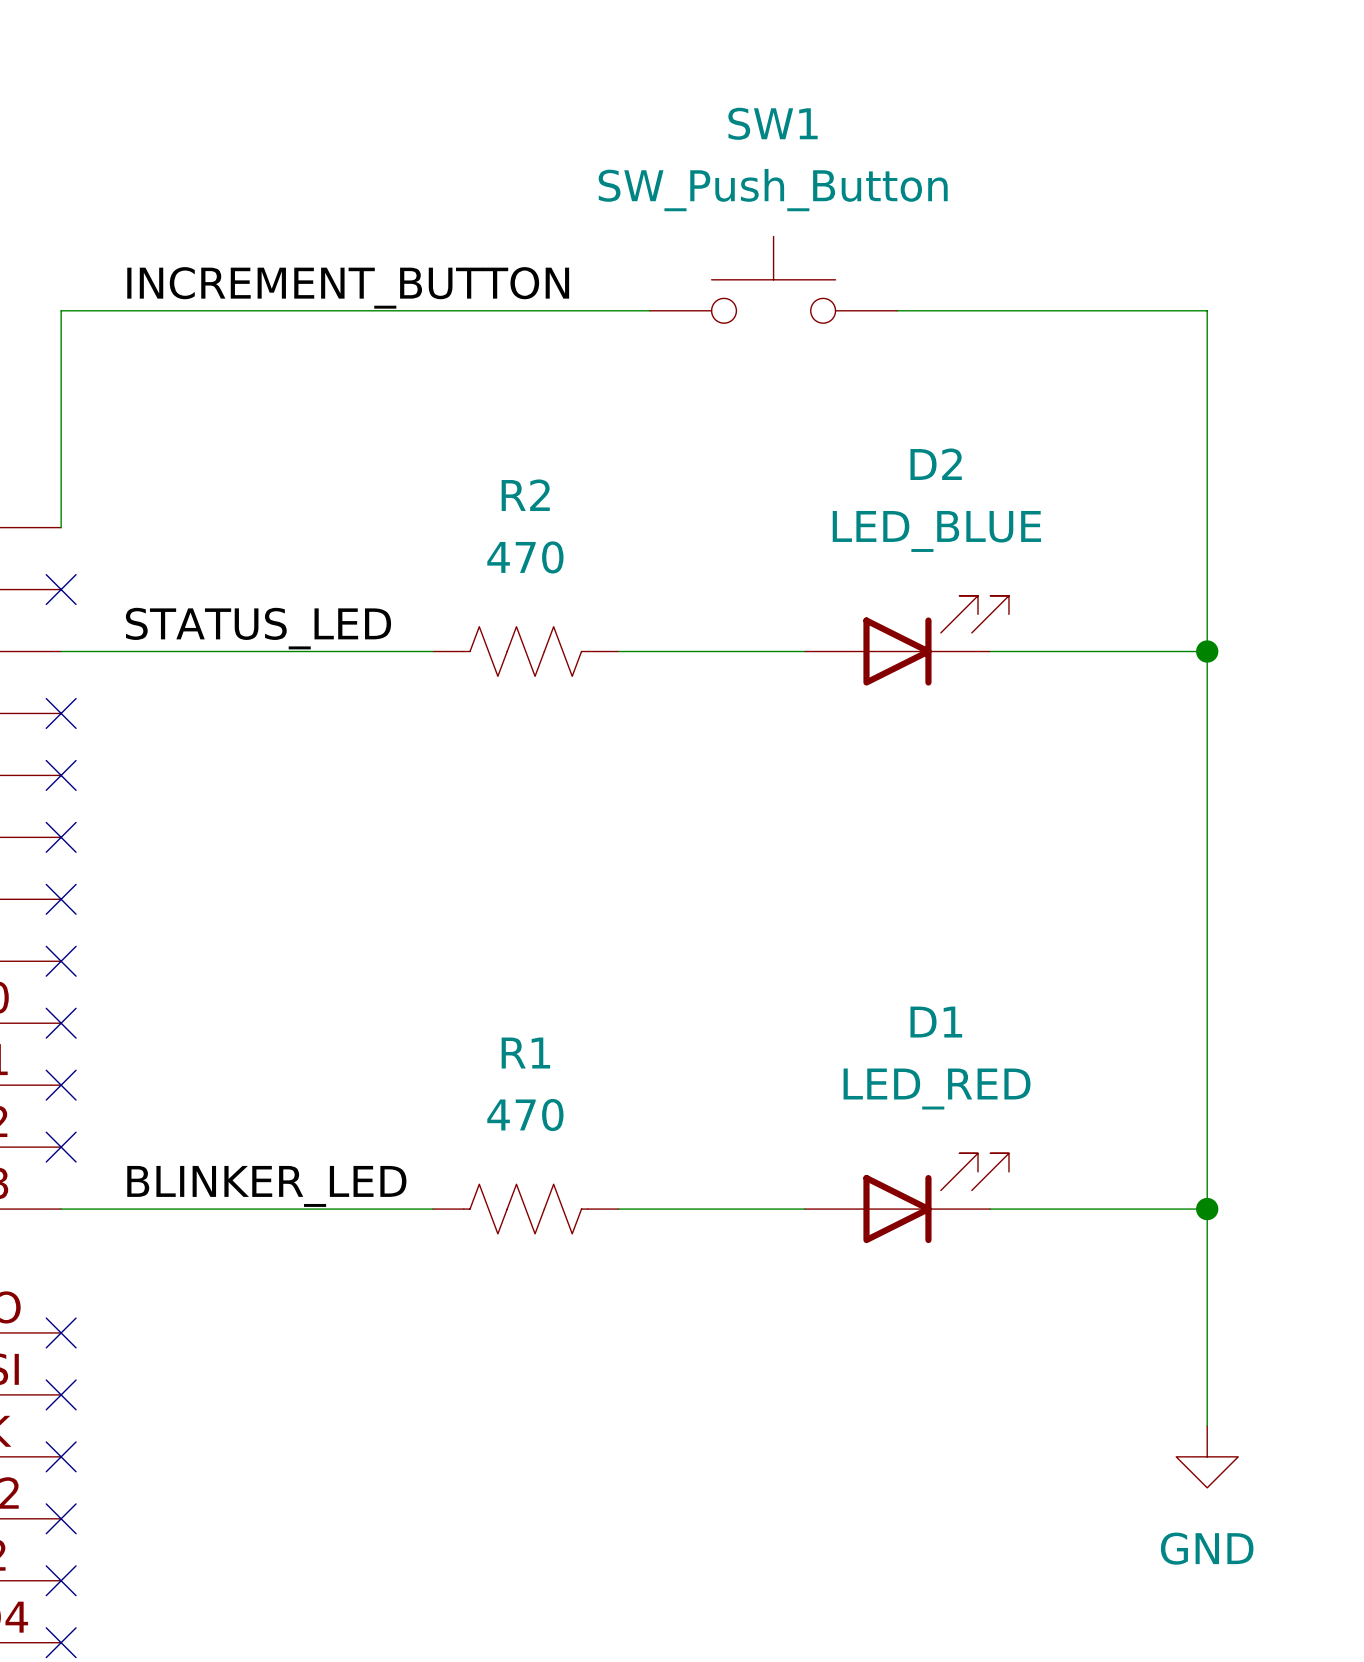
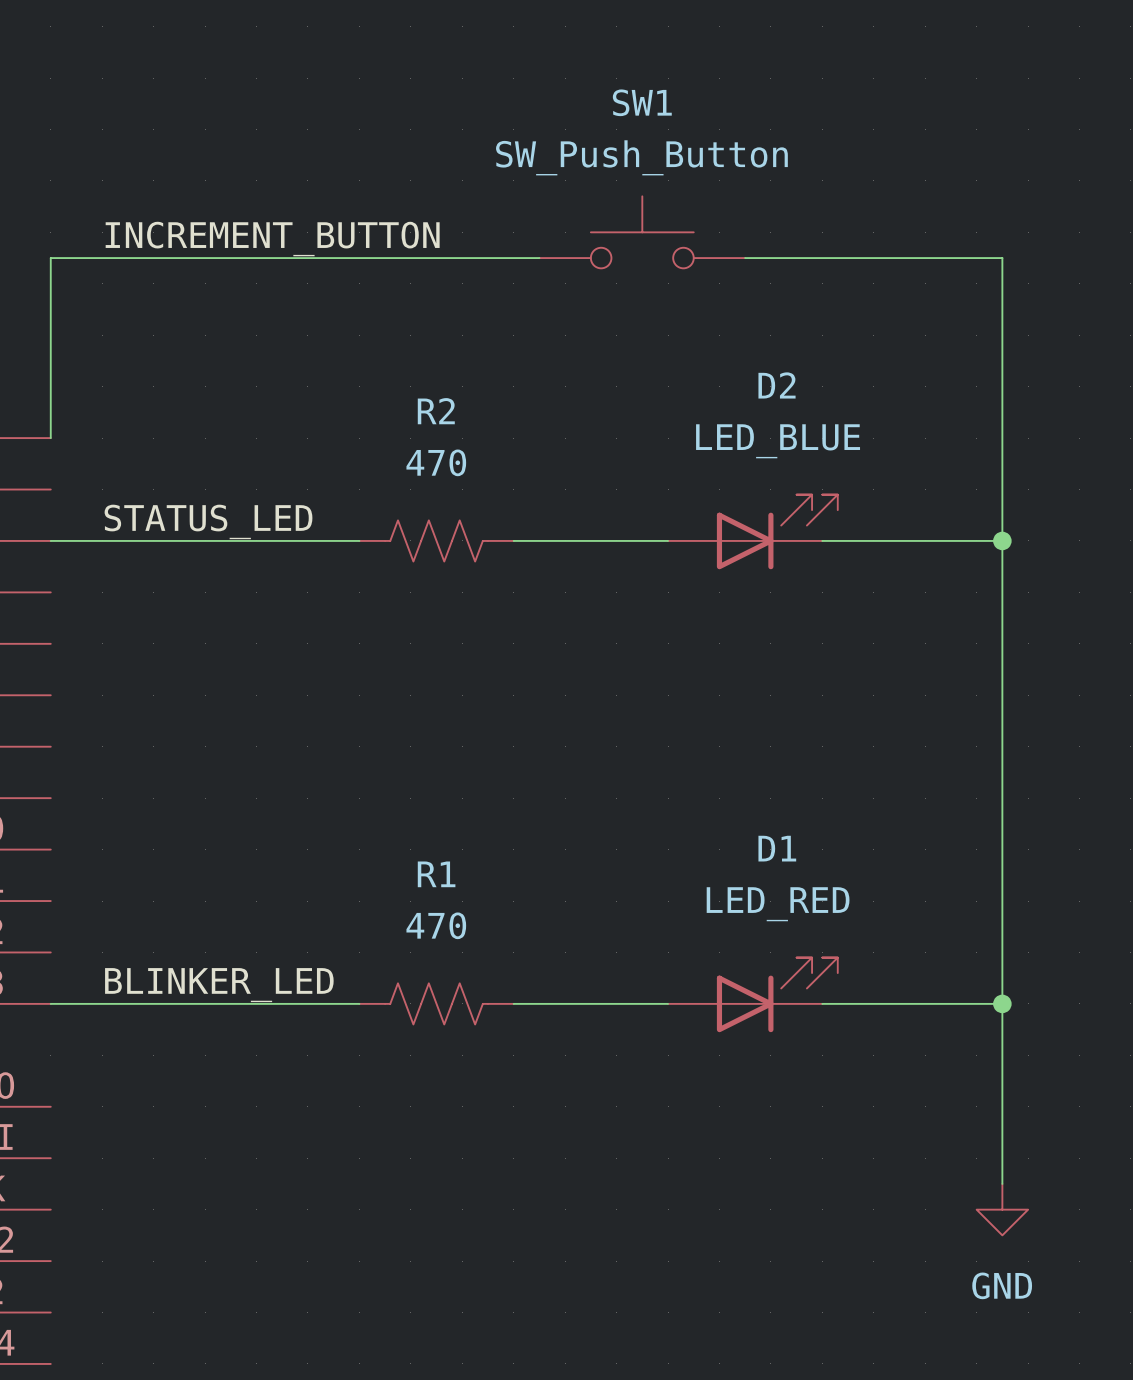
no-connect mark: (61, 589) -> none
no-connect mark: (61, 713) -> none
no-connect mark: (61, 775) -> none
no-connect mark: (61, 837) -> none
no-connect mark: (61, 899) -> none
no-connect mark: (61, 961) -> none
no-connect mark: (61, 1023) -> none
no-connect mark: (61, 1085) -> none
no-connect mark: (61, 1147) -> none
no-connect mark: (61, 1332) -> none
no-connect mark: (61, 1394) -> none
no-connect mark: (61, 1456) -> none
no-connect mark: (61, 1518) -> none
no-connect mark: (61, 1580) -> none
no-connect mark: (61, 1642) -> none

